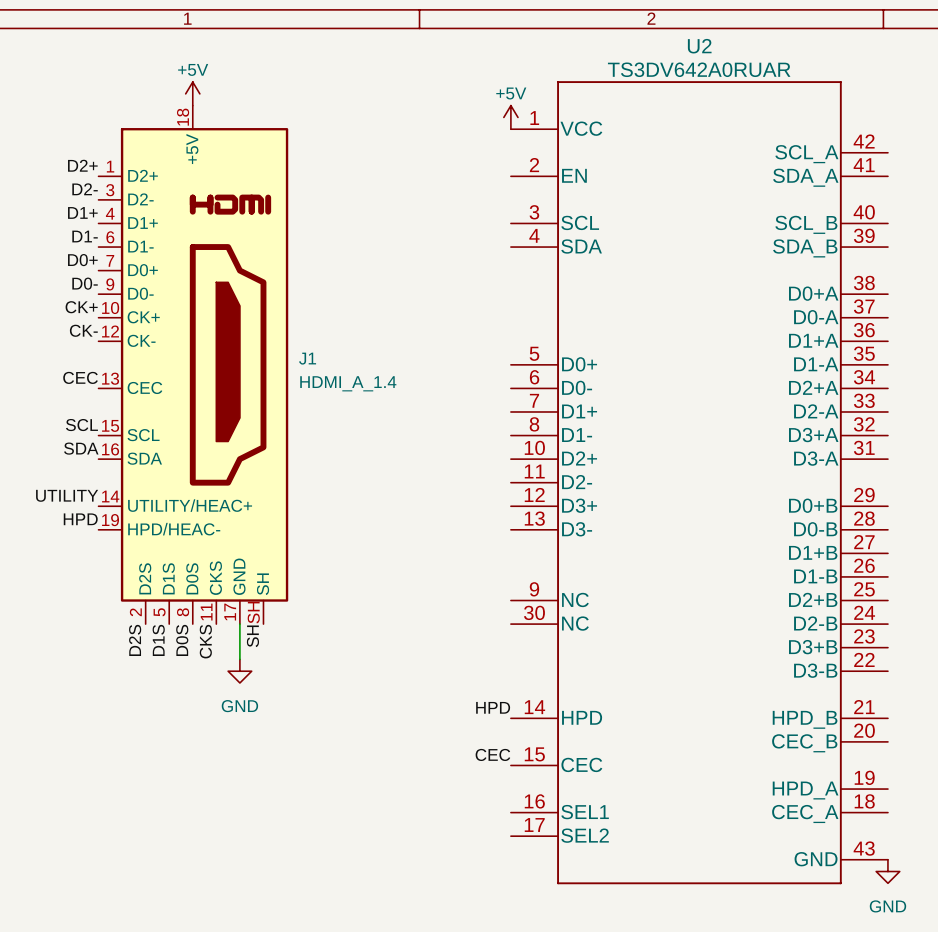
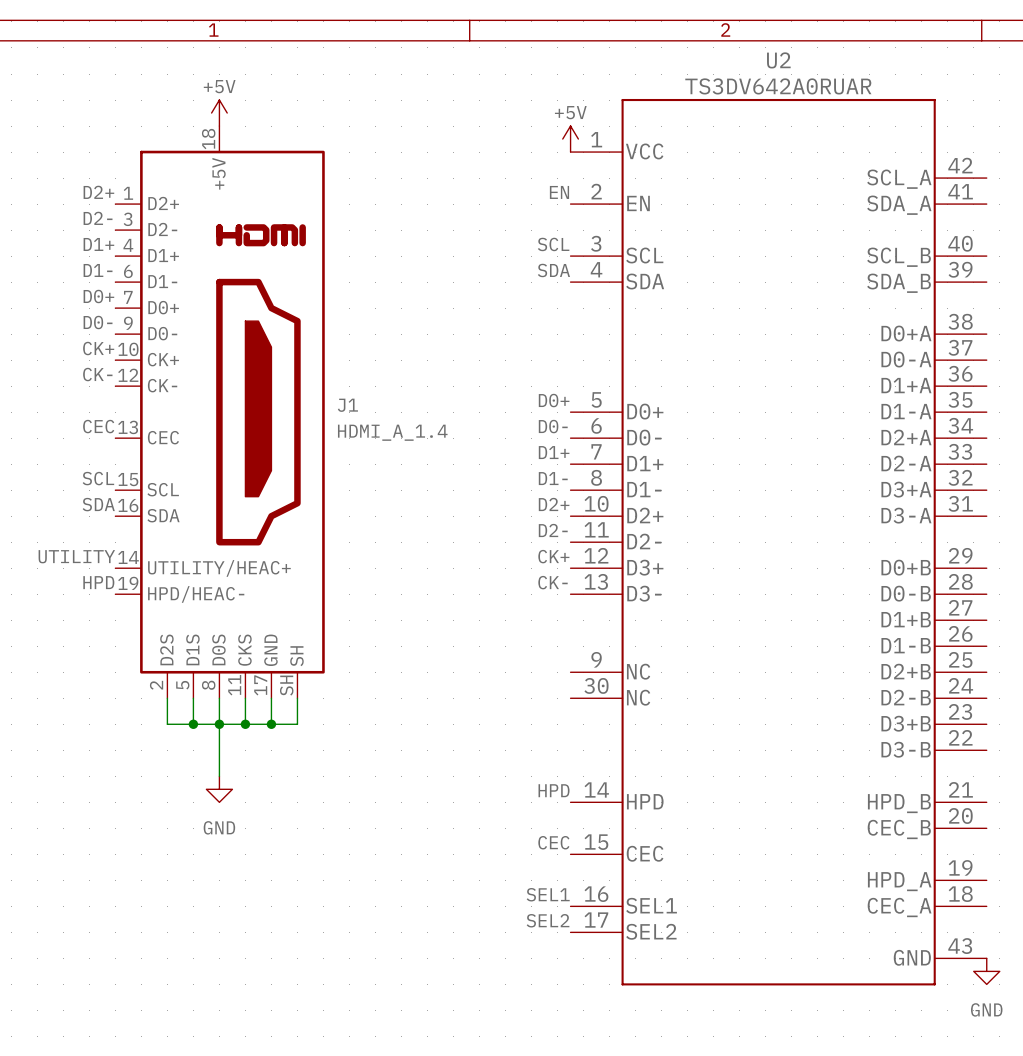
label: none -> EN (559, 192)
label: none -> SCL (553, 244)
label: none -> SDA (553, 270)
label: none -> D0+ (554, 400)
label: none -> D0- (553, 426)
label: none -> D1+ (554, 452)
label: none -> D1- (553, 478)
label: none -> D2+ (554, 504)
label: none -> D2- (553, 530)
label: none -> CK+ (553, 556)
label: none -> CK- (553, 582)
wire: none -> (167, 698) (167, 724) (297, 724) (297, 698)
wire: none -> (193, 698) (193, 724)
wire: none -> (219, 698) (219, 776)
wire: none -> (245, 698) (245, 724)
label: SH (252, 636) -> none
label: D2S (135, 640) -> none
label: D1S (158, 640) -> none
label: D0S (182, 640) -> none
label: CKS (205, 641) -> none
junction: none -> (193, 724)
junction: none -> (219, 724)
junction: none -> (245, 724)
wire: (239, 647) (239, 659) -> none
junction: none -> (271, 724)
power symbol position: GND (239, 671) -> GND (219, 789)
label: none -> SEL1 (548, 894)
label: none -> SEL2 (548, 920)

